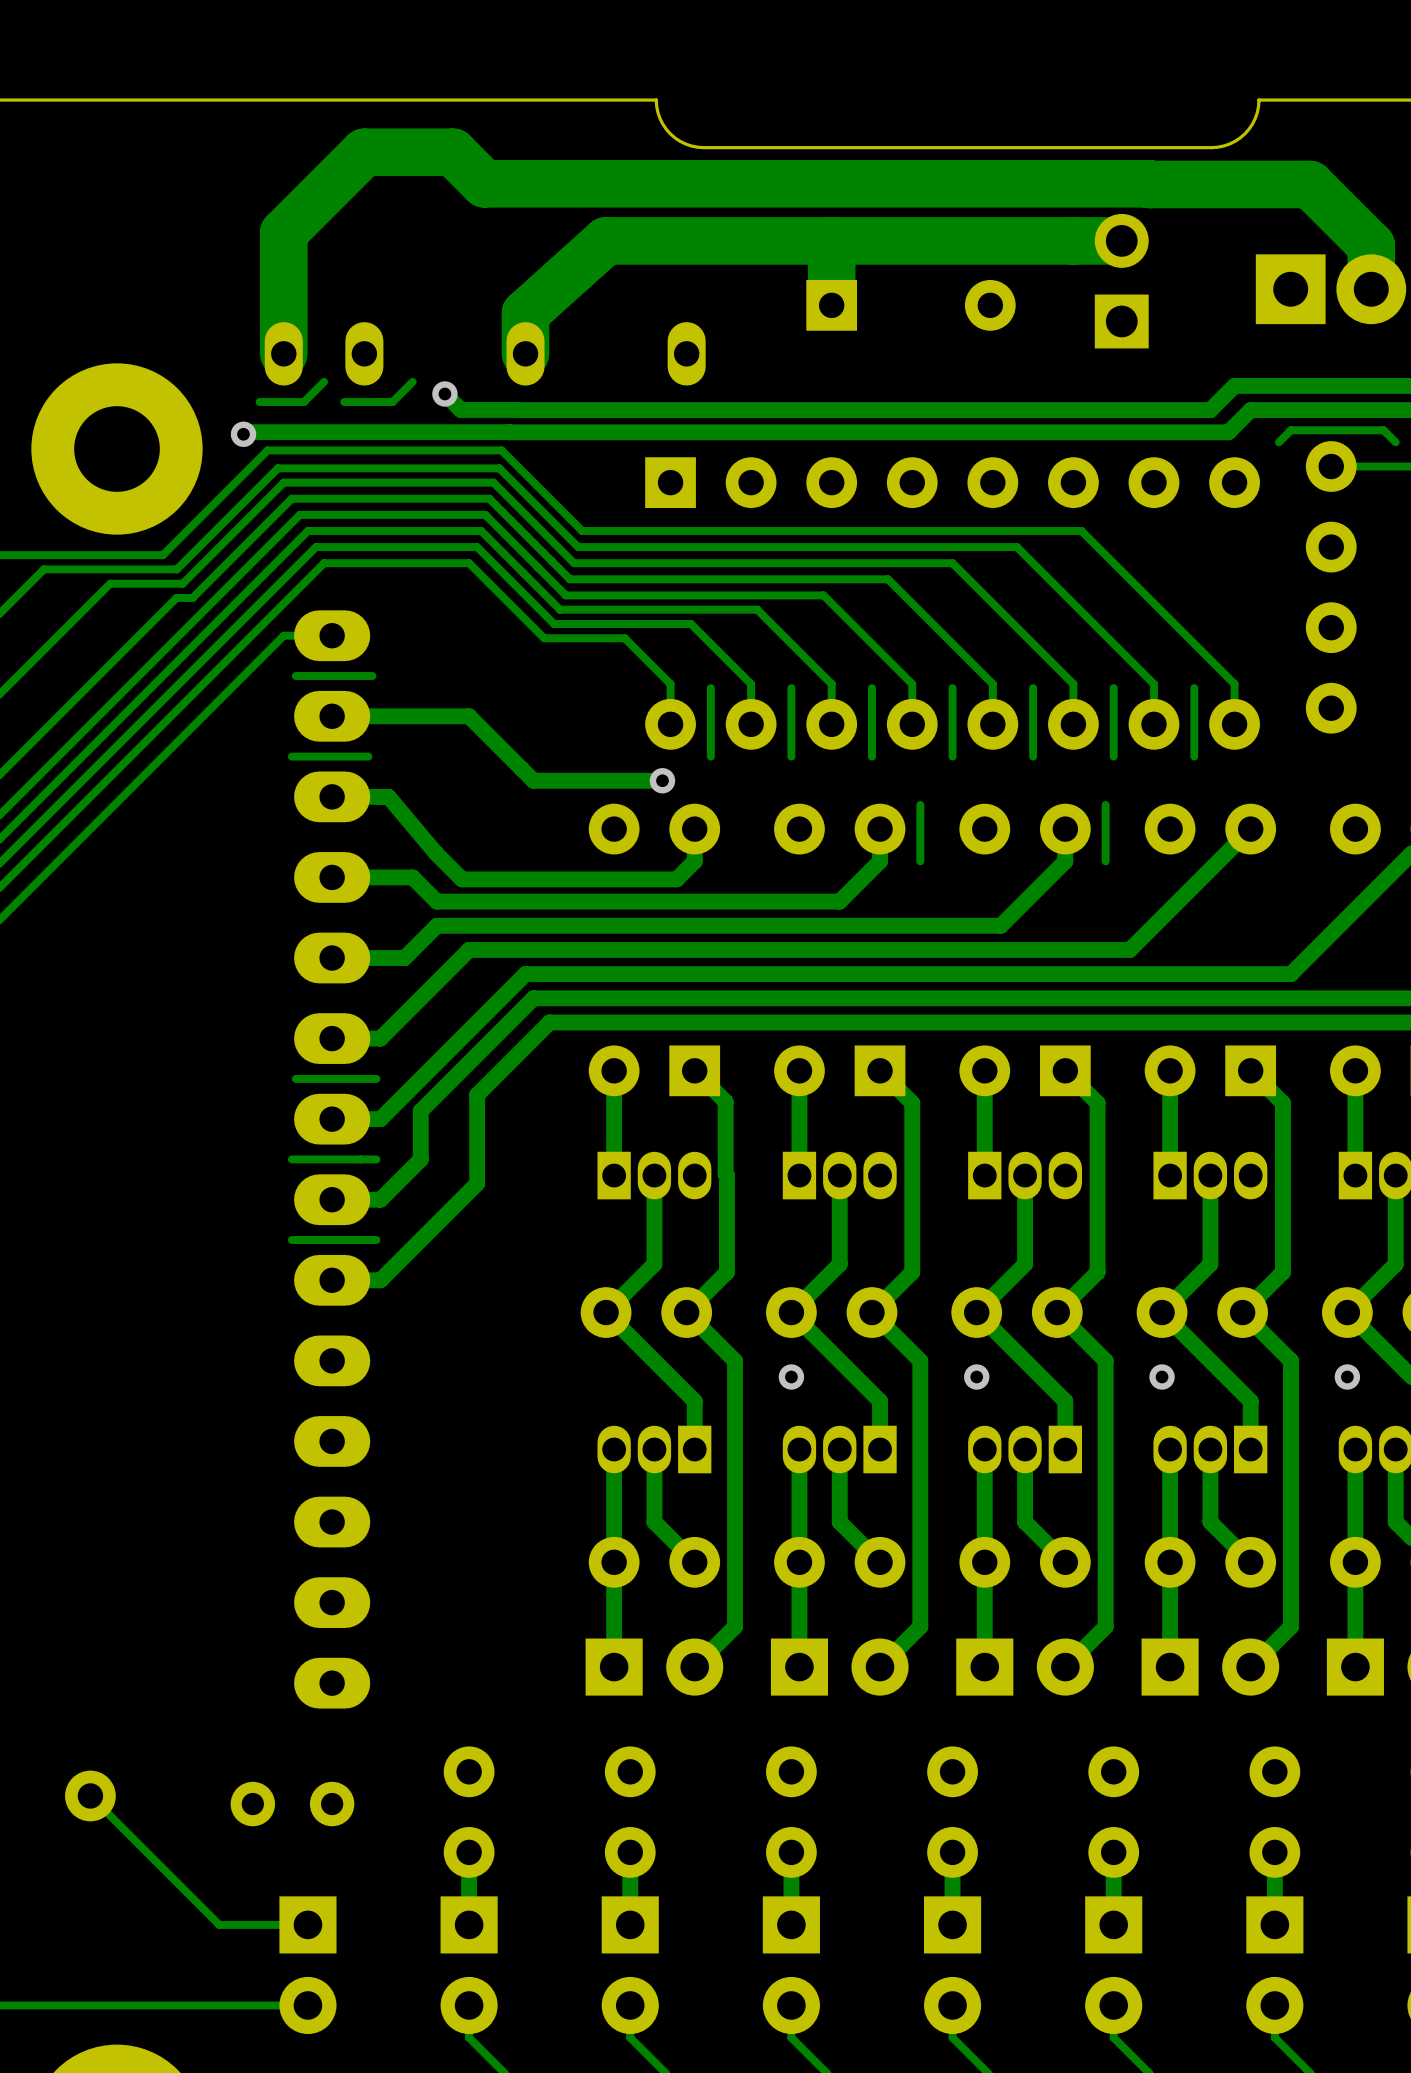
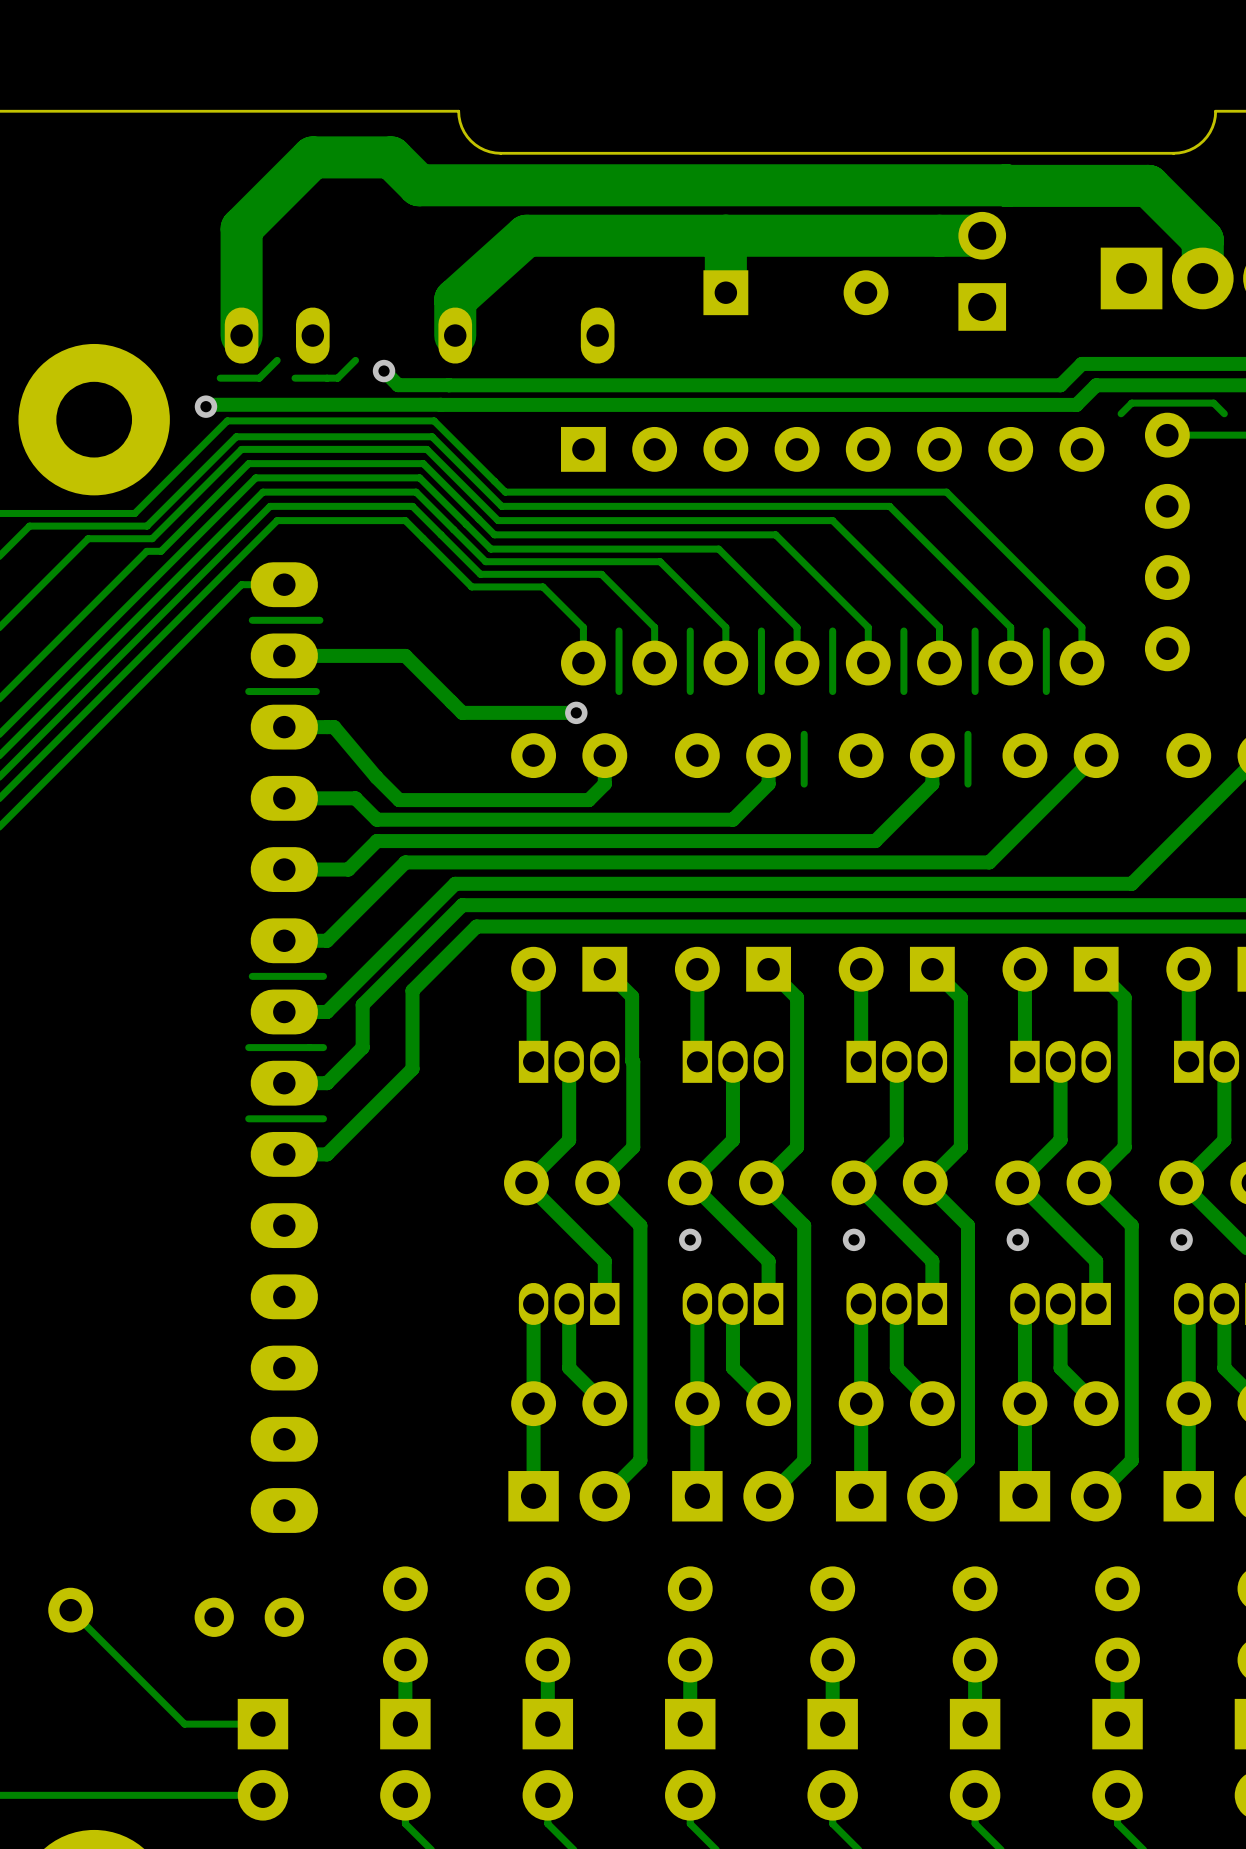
board edge: (529, 100) (656, 100) (659, 118) (670, 133) (685, 144) (703, 147) -> (458, 111) (460, 122) (467, 136) (475, 144) (489, 151) (612, 153)
board edge: (1385, 100) (1258, 100) (1255, 118) (1245, 133) (1229, 144) (1211, 147) -> (1215, 111) (1214, 122) (1206, 136) (1199, 144) (1184, 151) (1061, 153)

